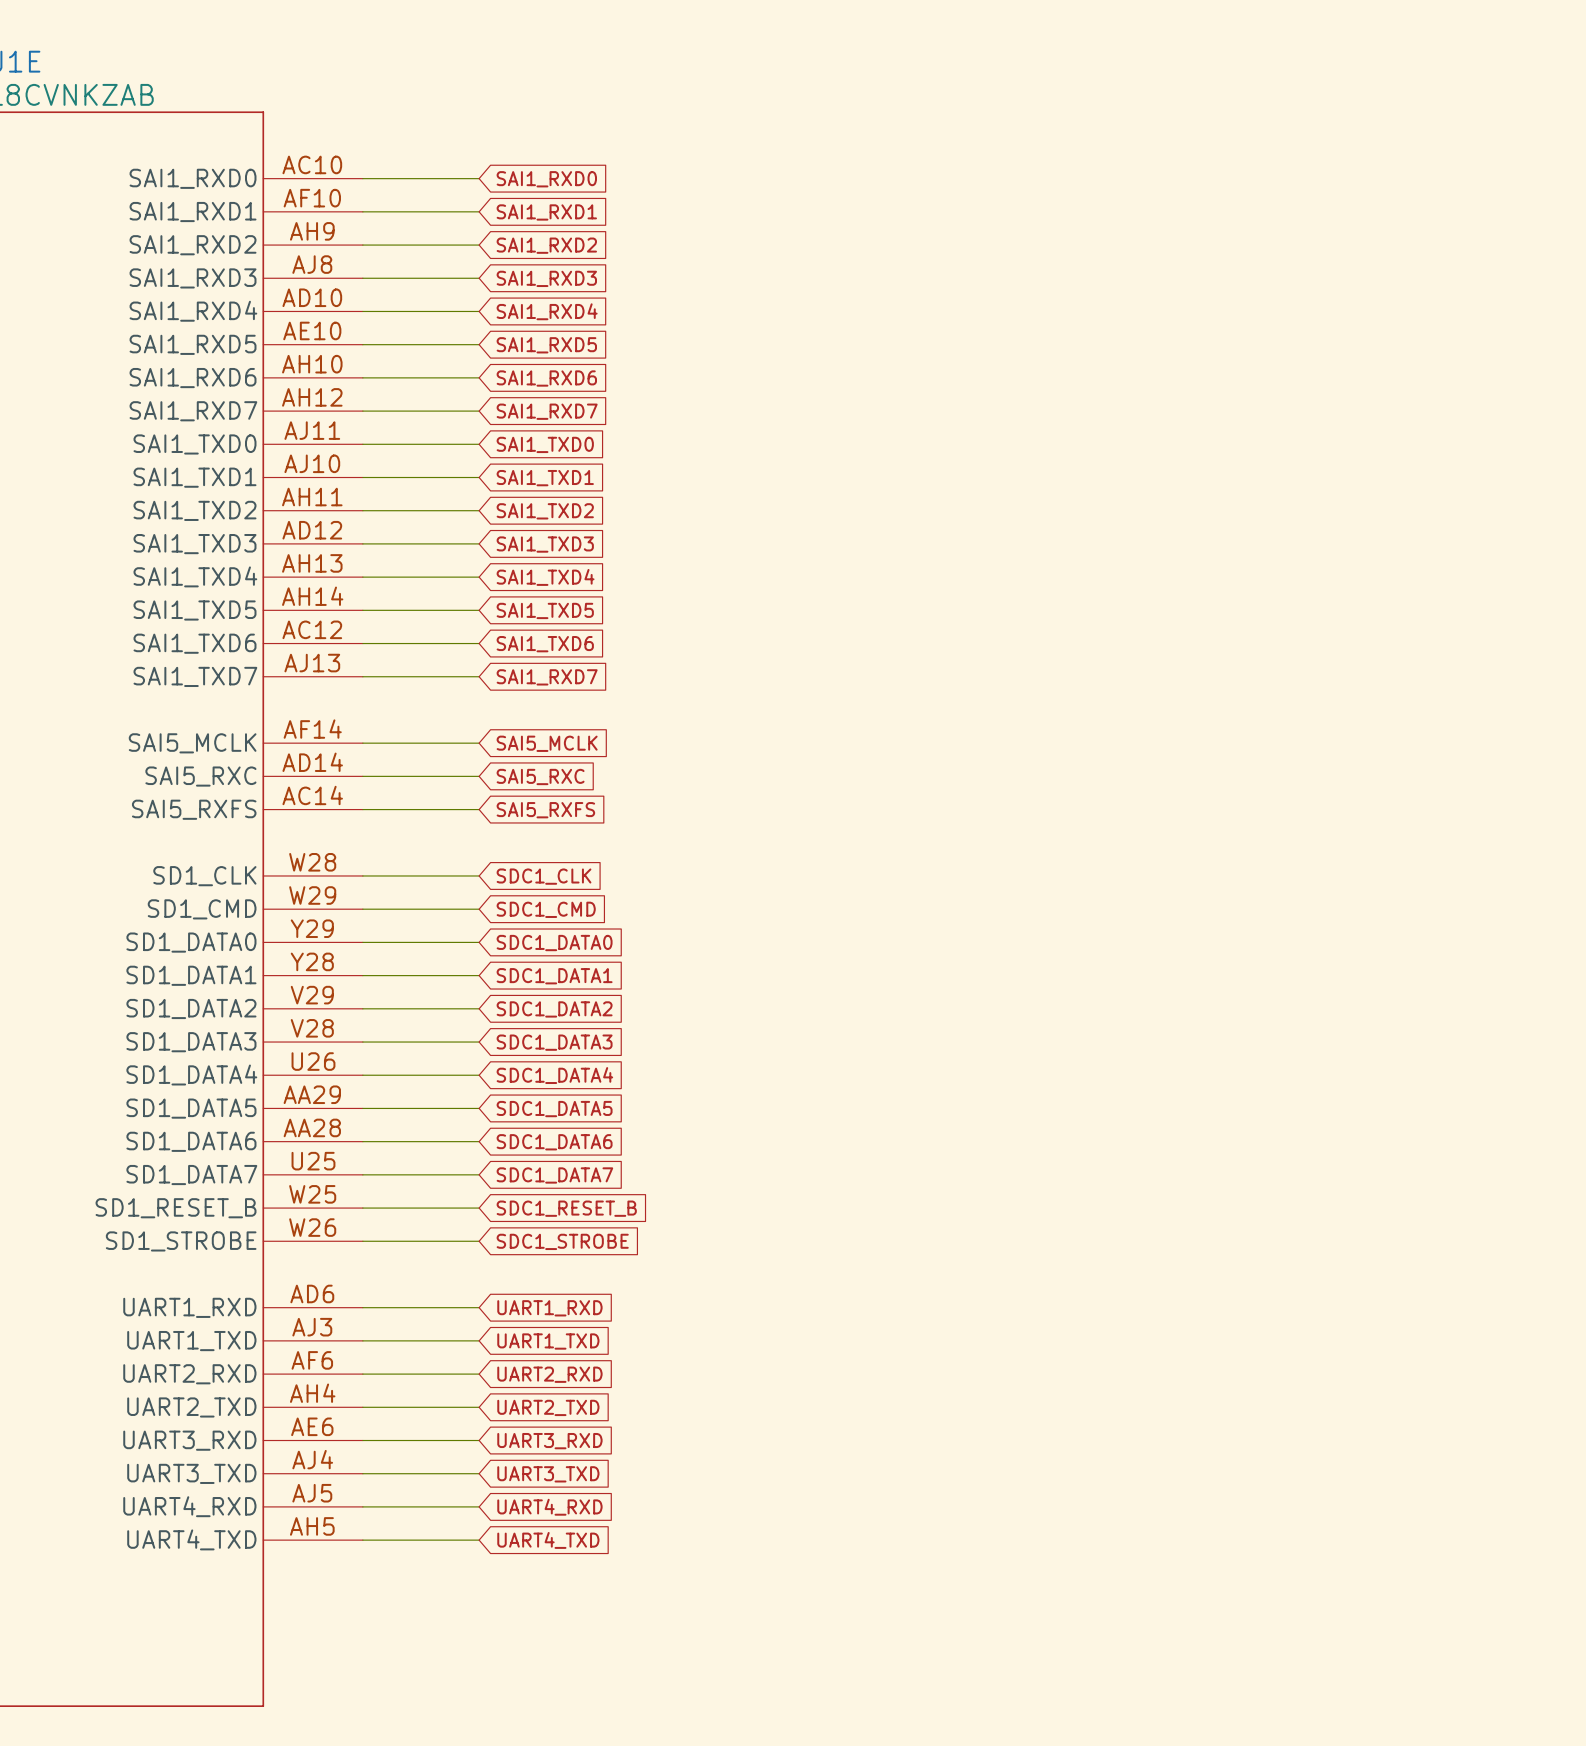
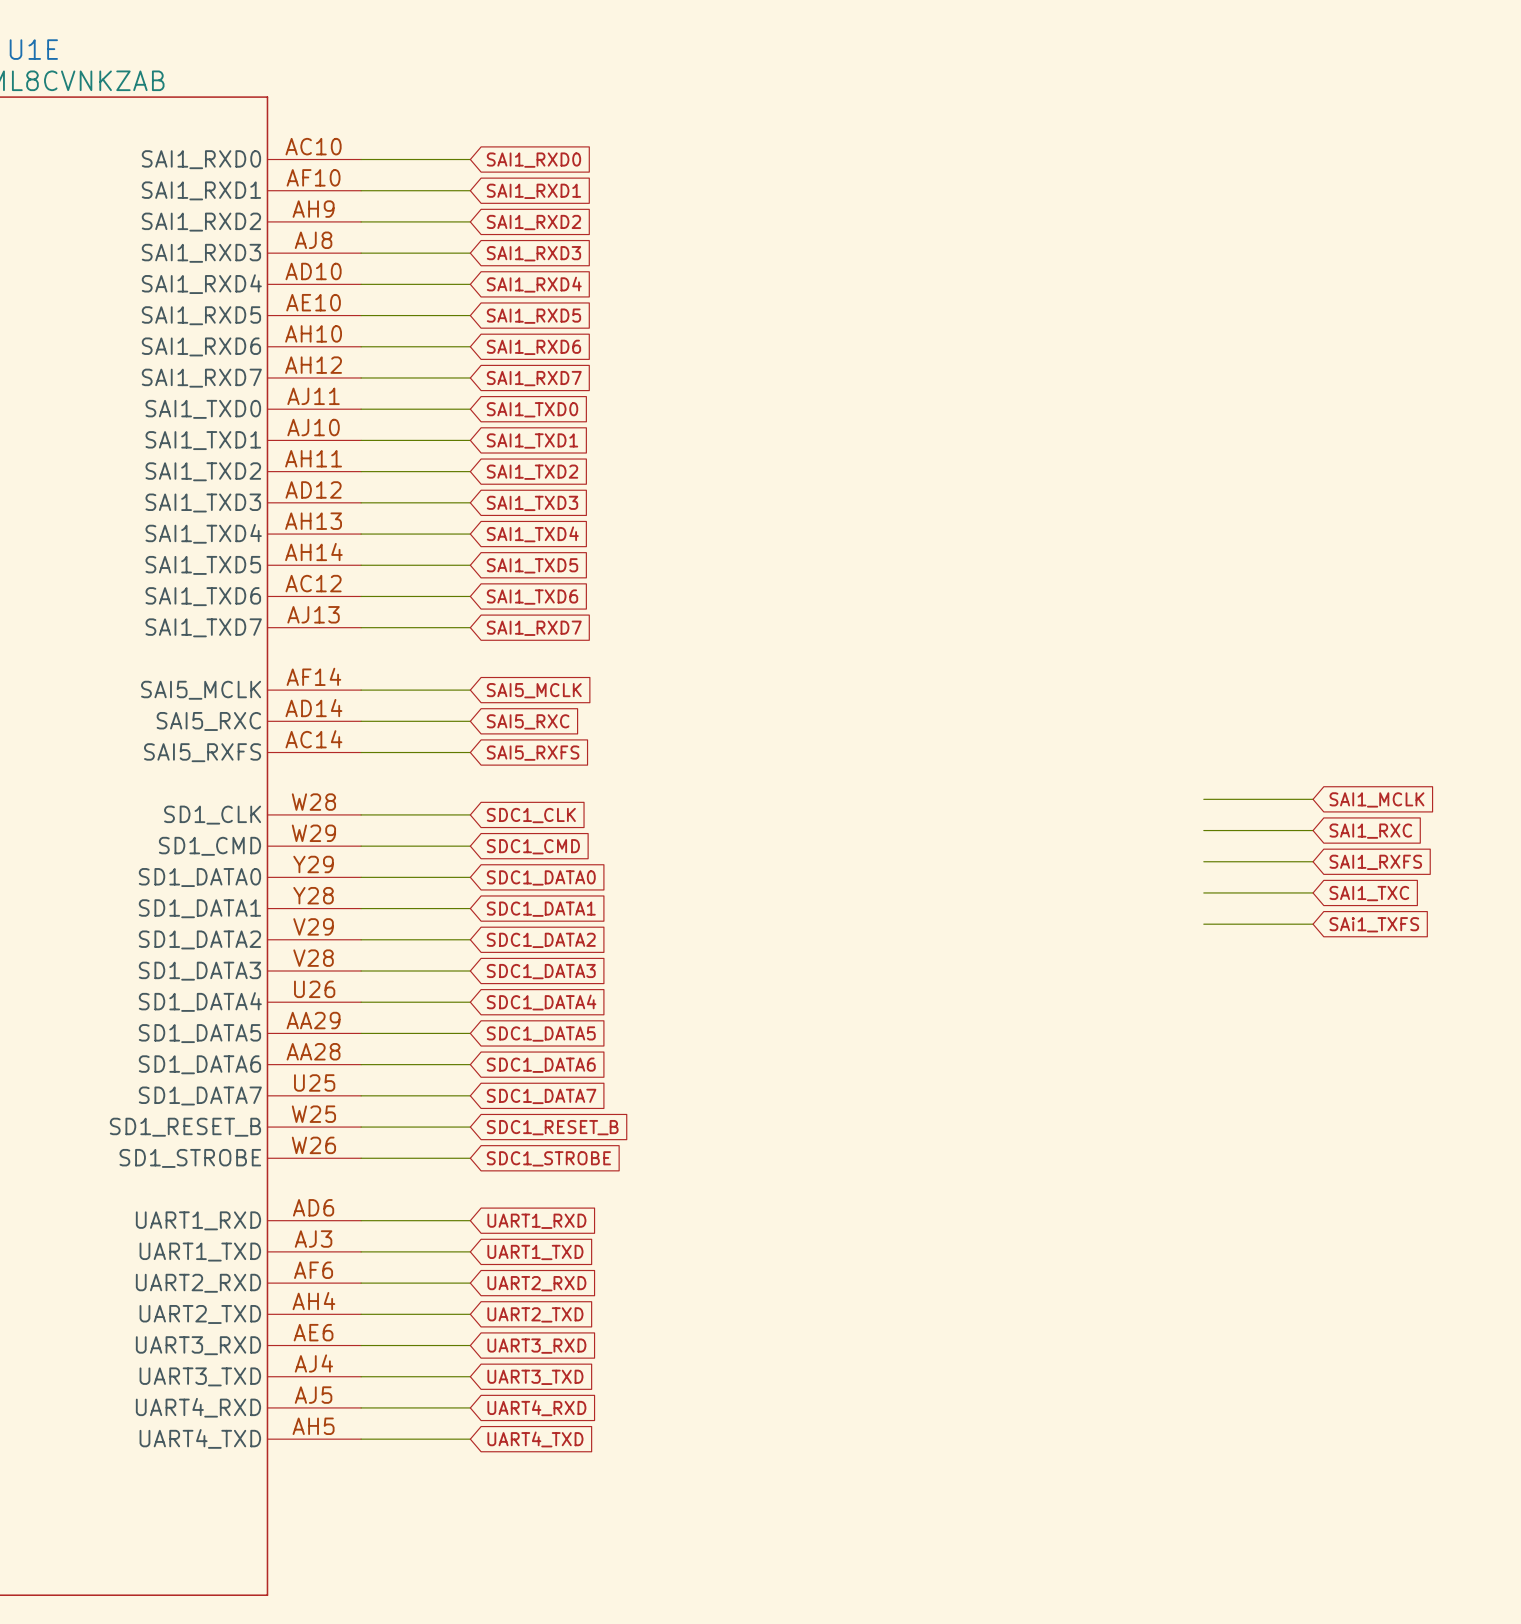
wire: none -> (1203, 799) (1313, 799)
global label: none -> SAI1_MCLK (1376, 799)
wire: none -> (1203, 830) (1313, 830)
global label: none -> SAI1_RXC (1370, 831)
wire: none -> (1203, 861) (1313, 861)
global label: none -> SAI1_RXFS (1375, 862)
wire: none -> (1203, 892) (1313, 892)
global label: none -> SAI1_TXC (1369, 893)
wire: none -> (1203, 924) (1313, 924)
global label: none -> SAi1_TXFS (1374, 924)

